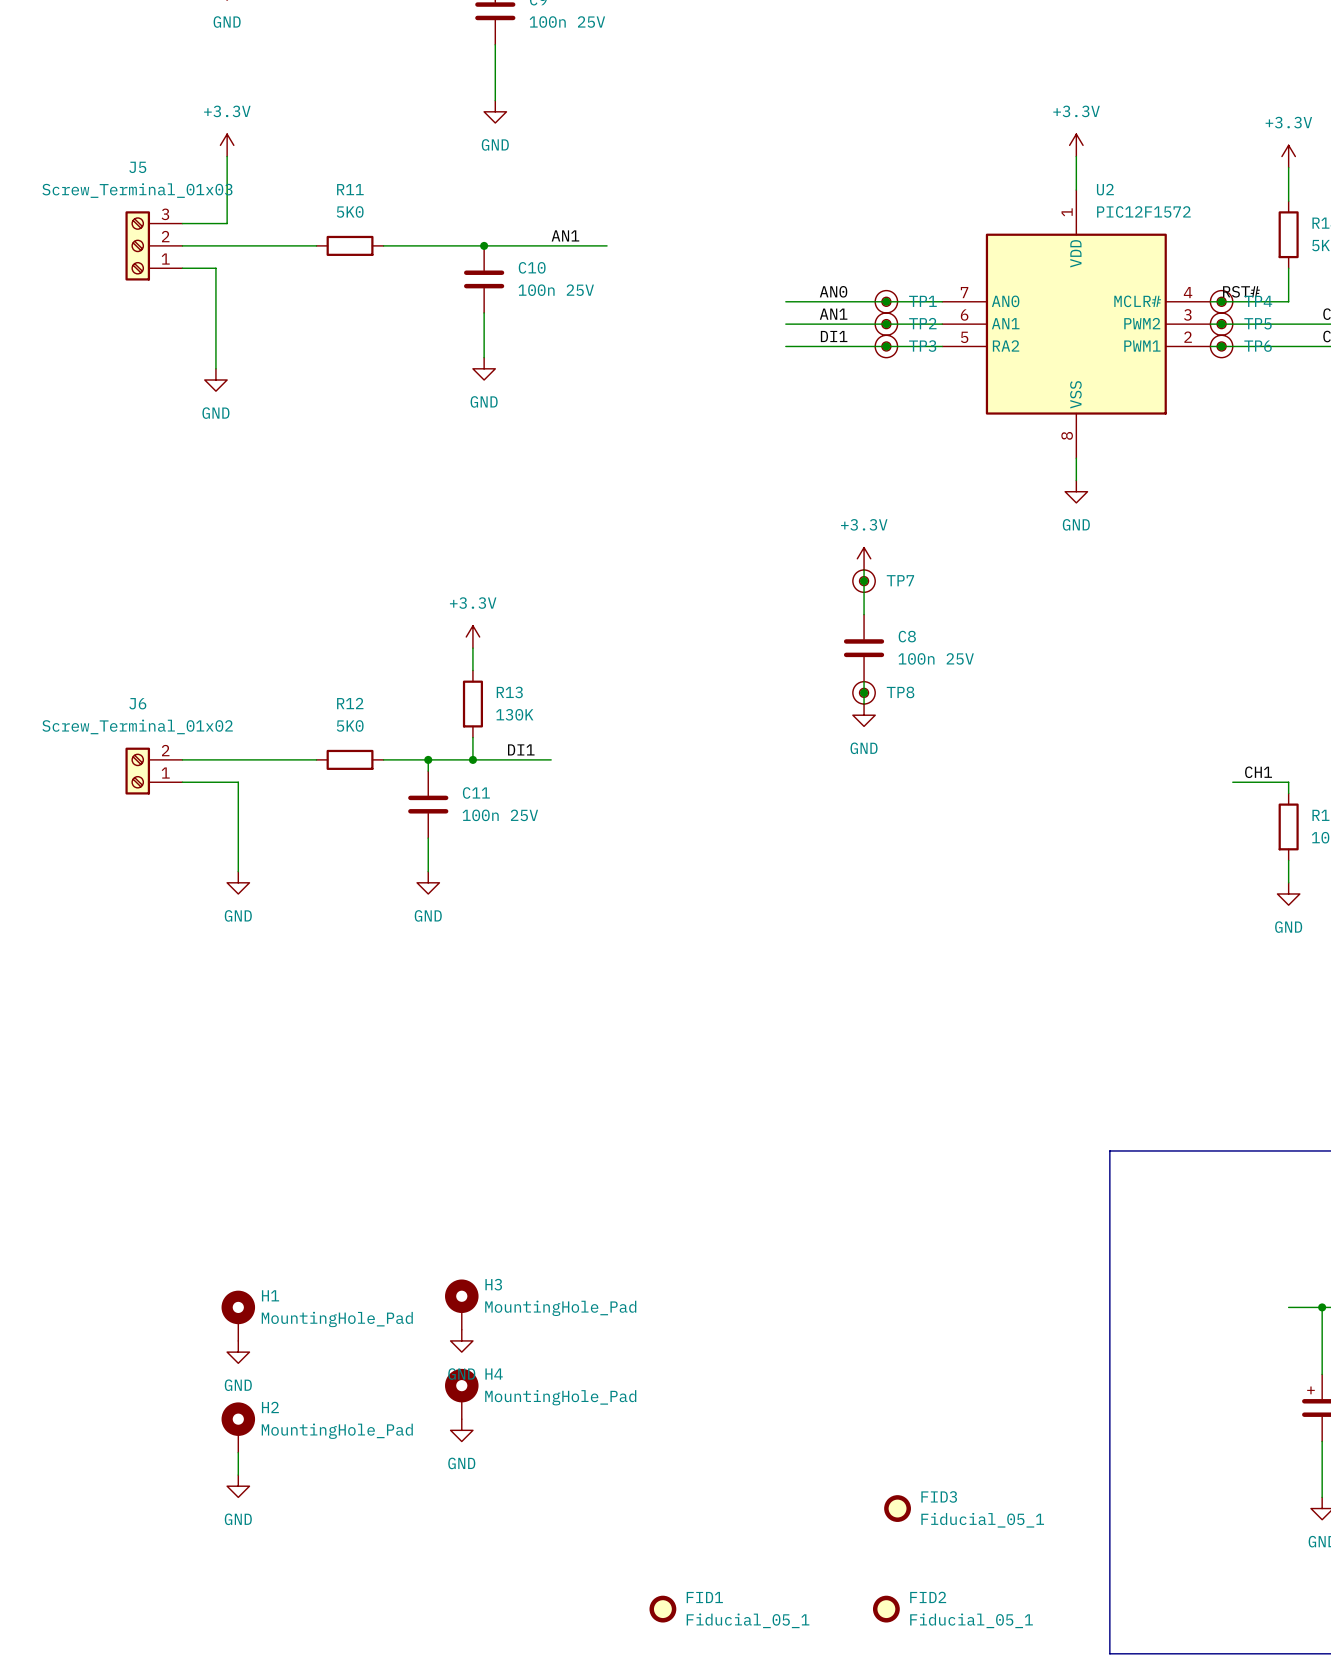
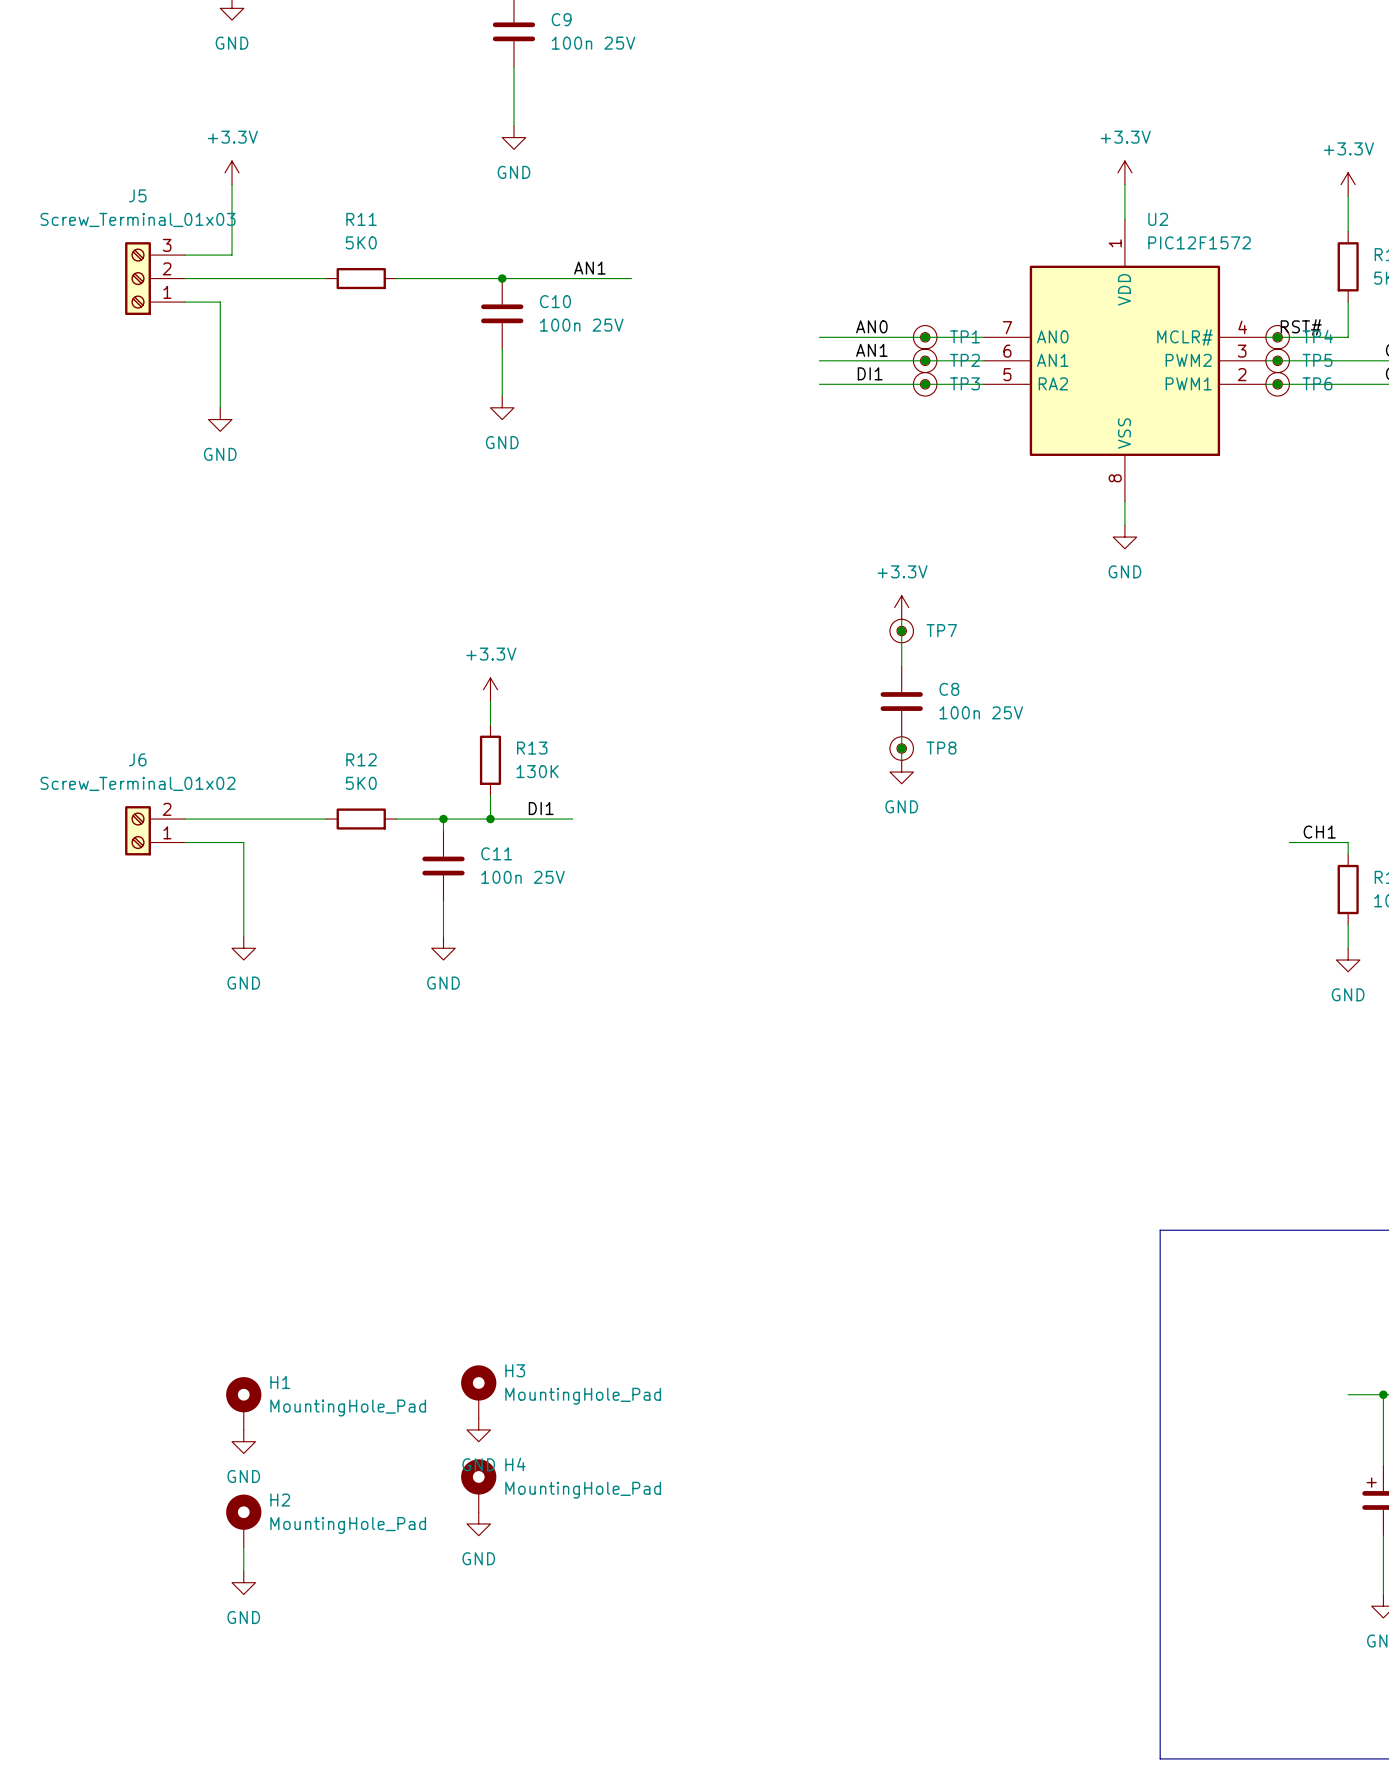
FID3: Fiducial_05_1 (897, 1508) -> none
FID1: Fiducial_05_1 (662, 1609) -> none
FID2: Fiducial_05_1 (886, 1609) -> none

